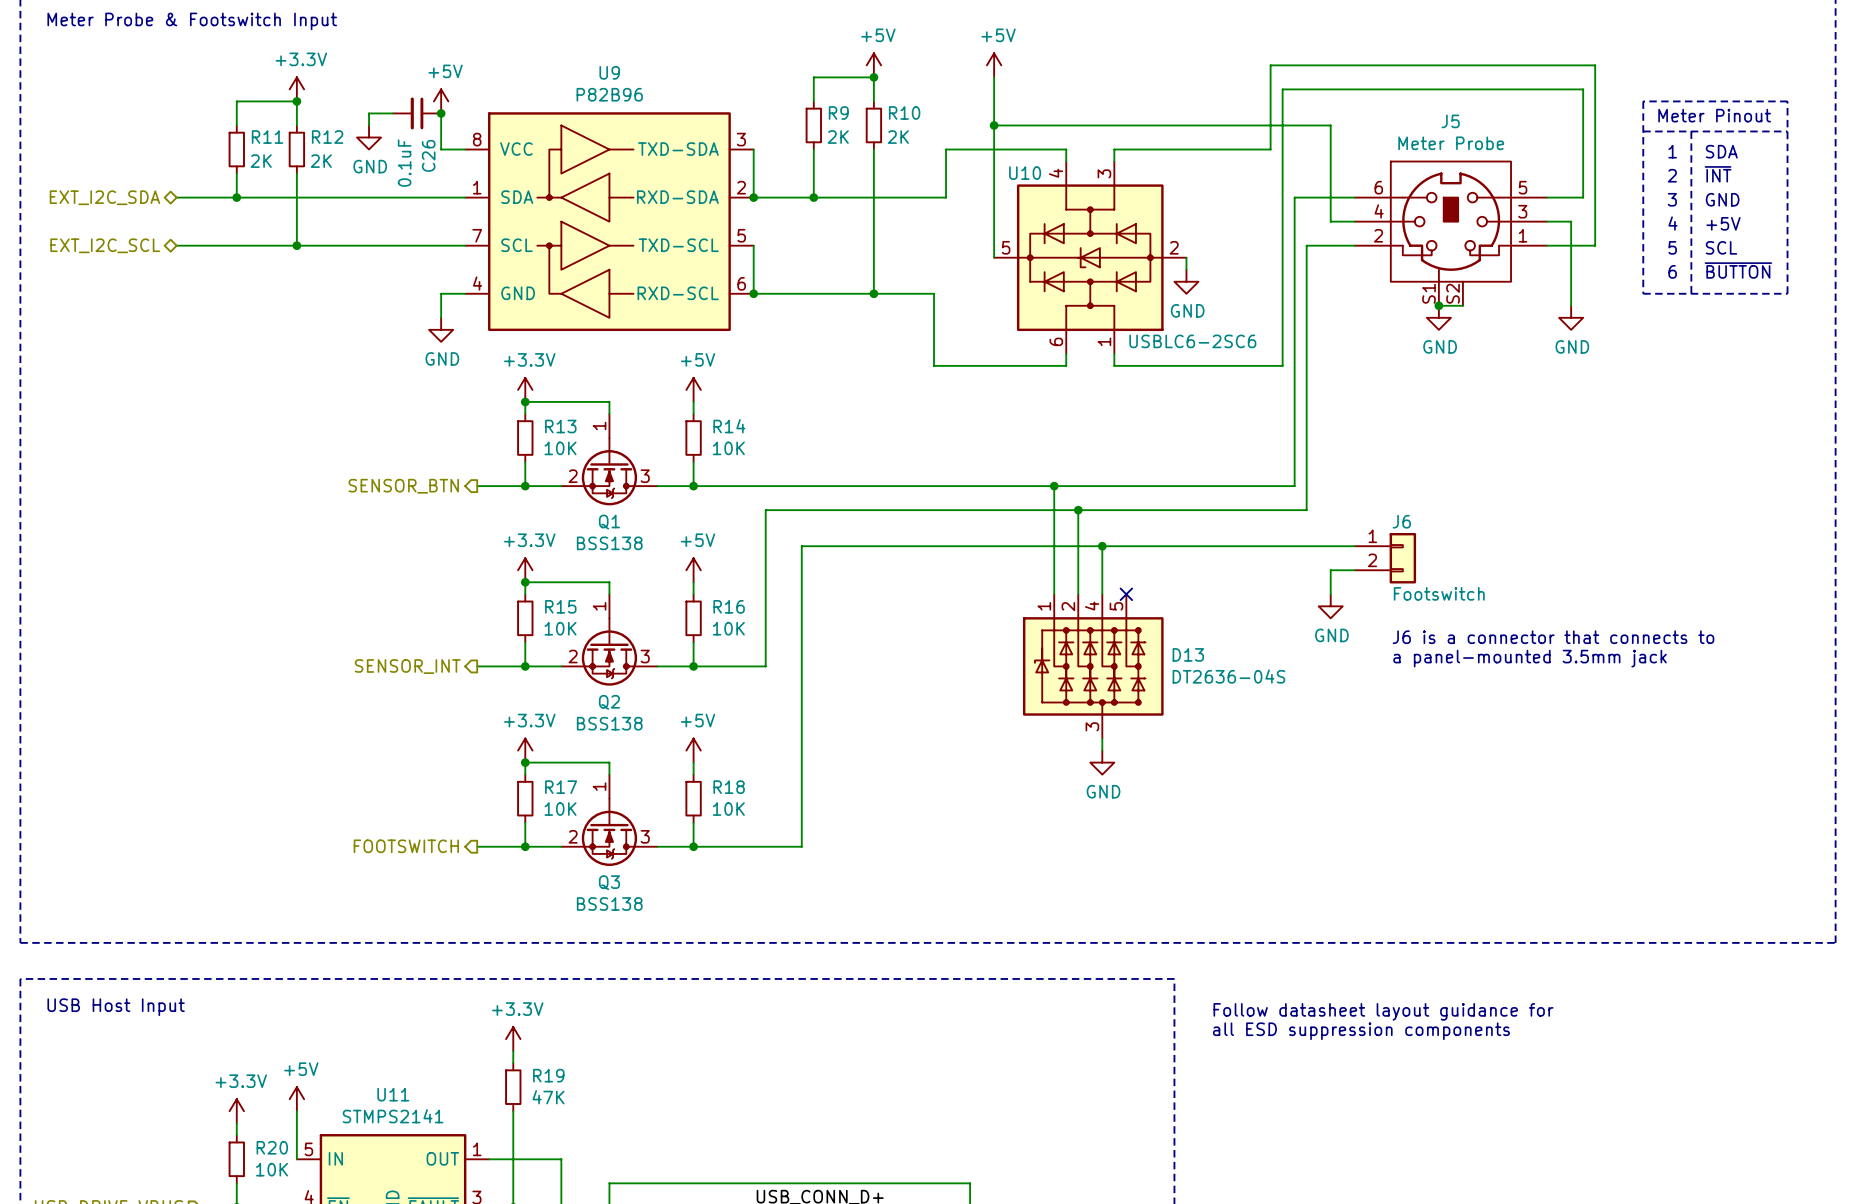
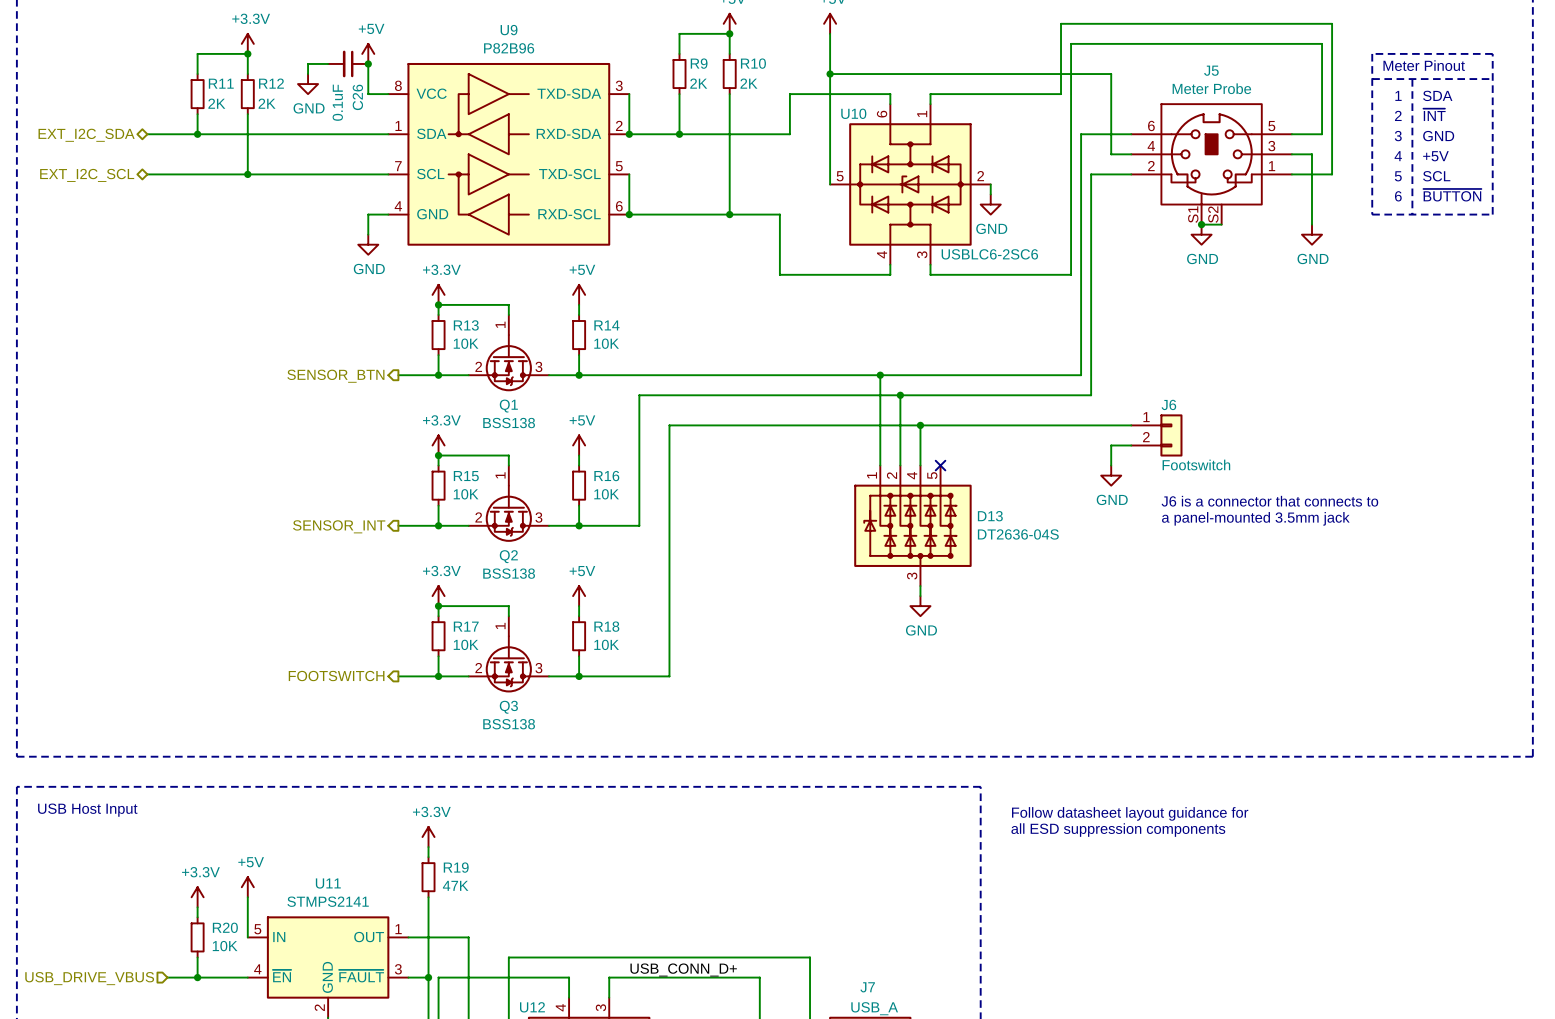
U10 flip: as is (1090, 257) -> up-down (910, 184)

